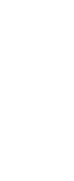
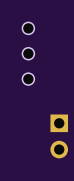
part: none -> (28, 28)
part: none -> (28, 53)
part: none -> (28, 79)
part: none -> (59, 136)

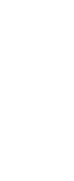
part: (28, 28) -> none
part: (28, 53) -> none
part: (28, 79) -> none
part: (59, 136) -> none

